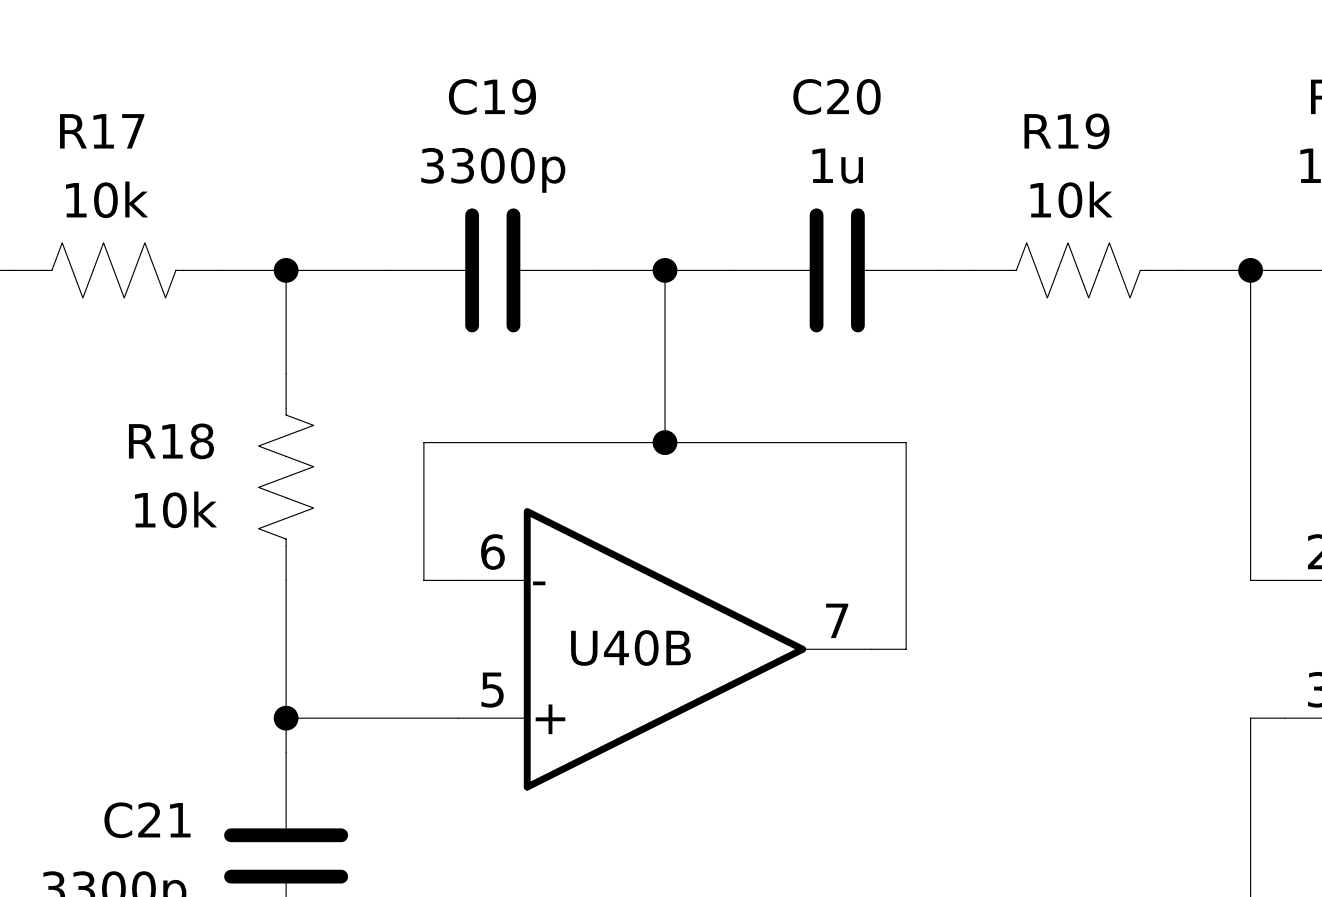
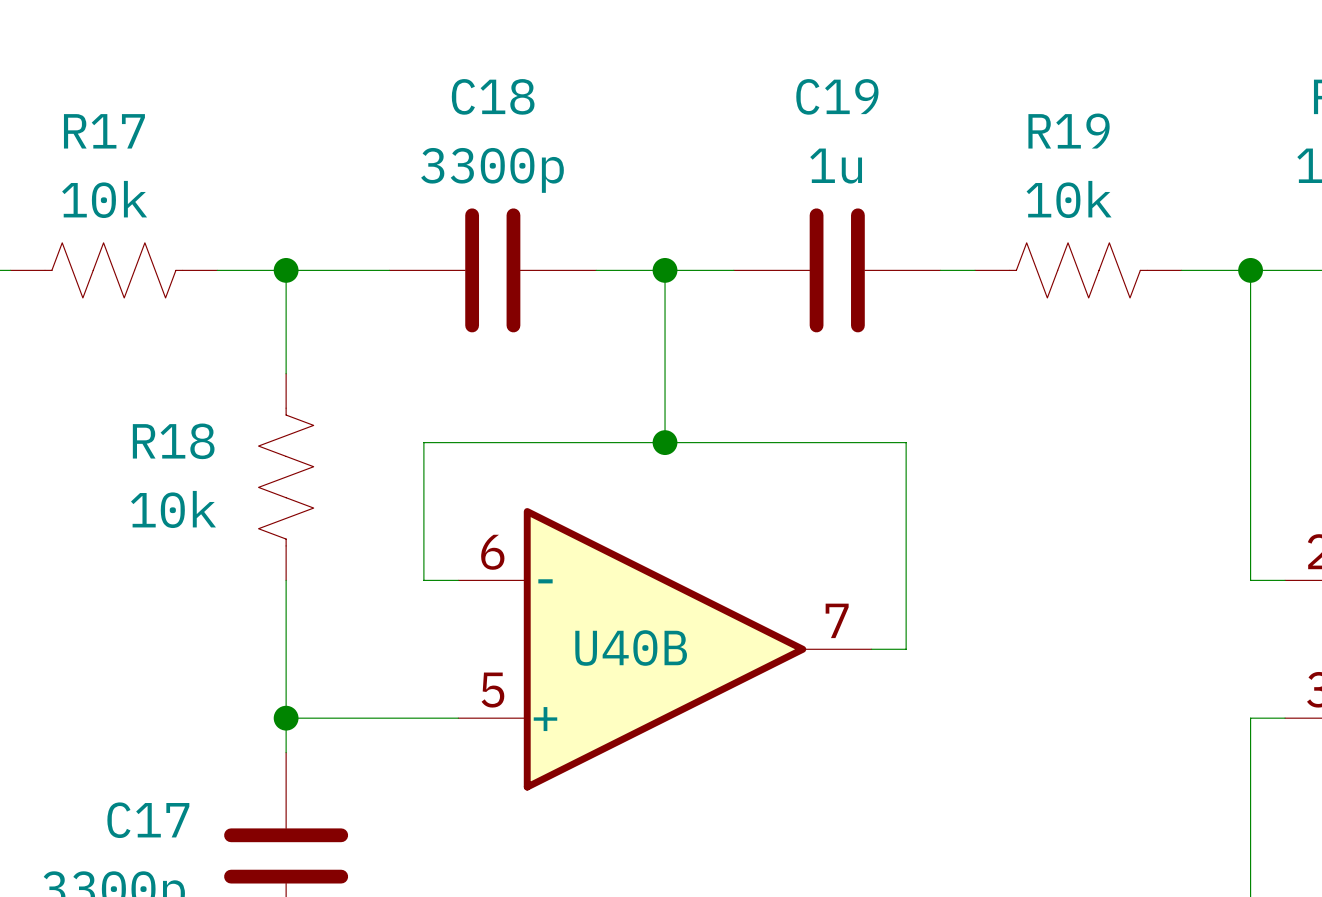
C19 name: C19 (492, 96) -> C18 (493, 96)
C20 name: C20 (837, 96) -> C19 (837, 96)
C21 name: C21 (147, 820) -> C17 (148, 820)

